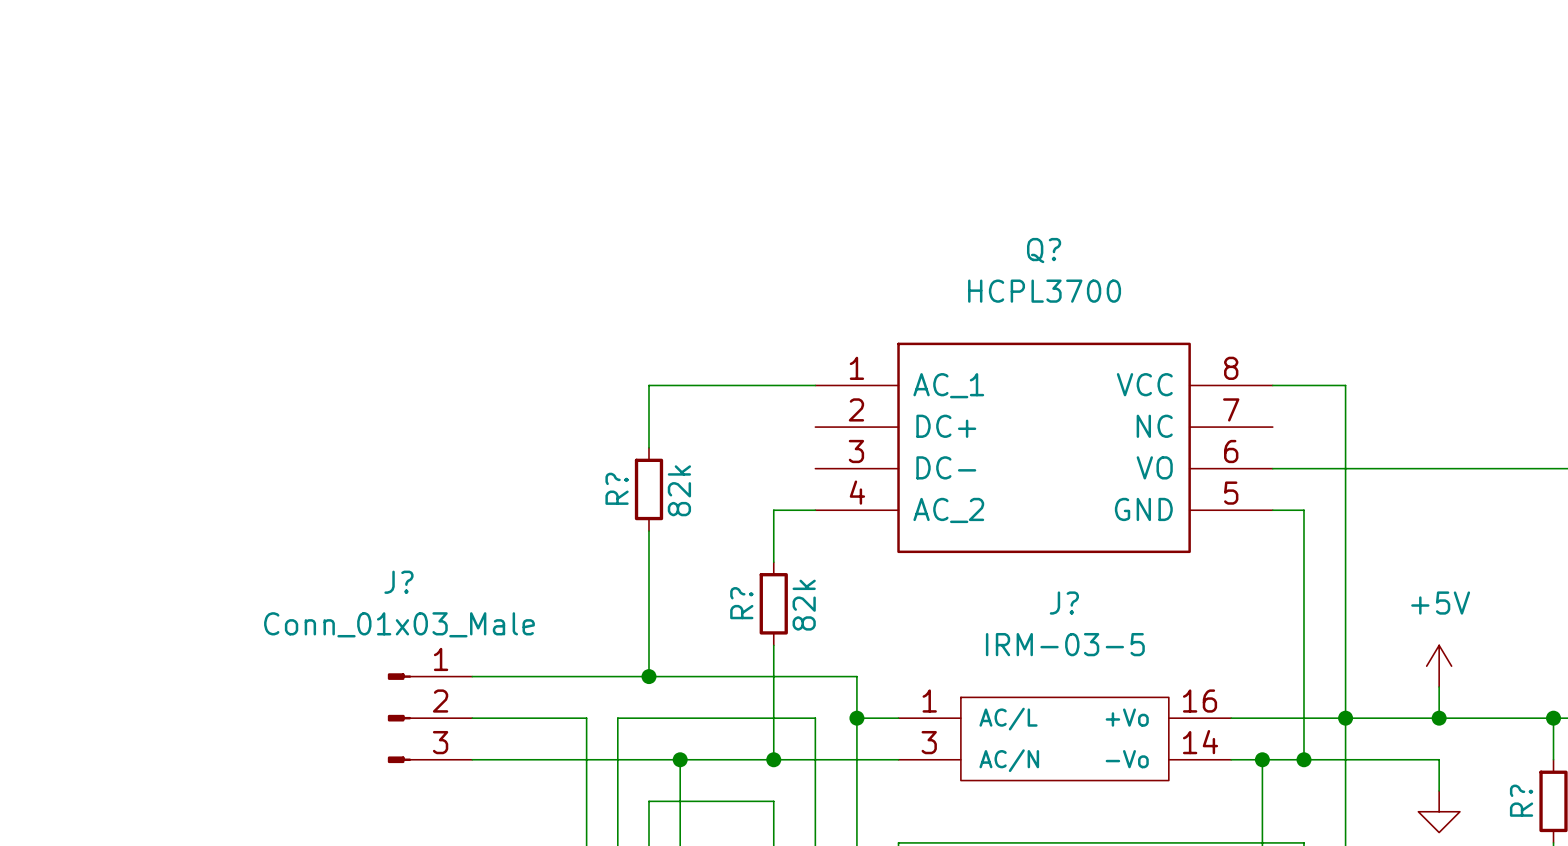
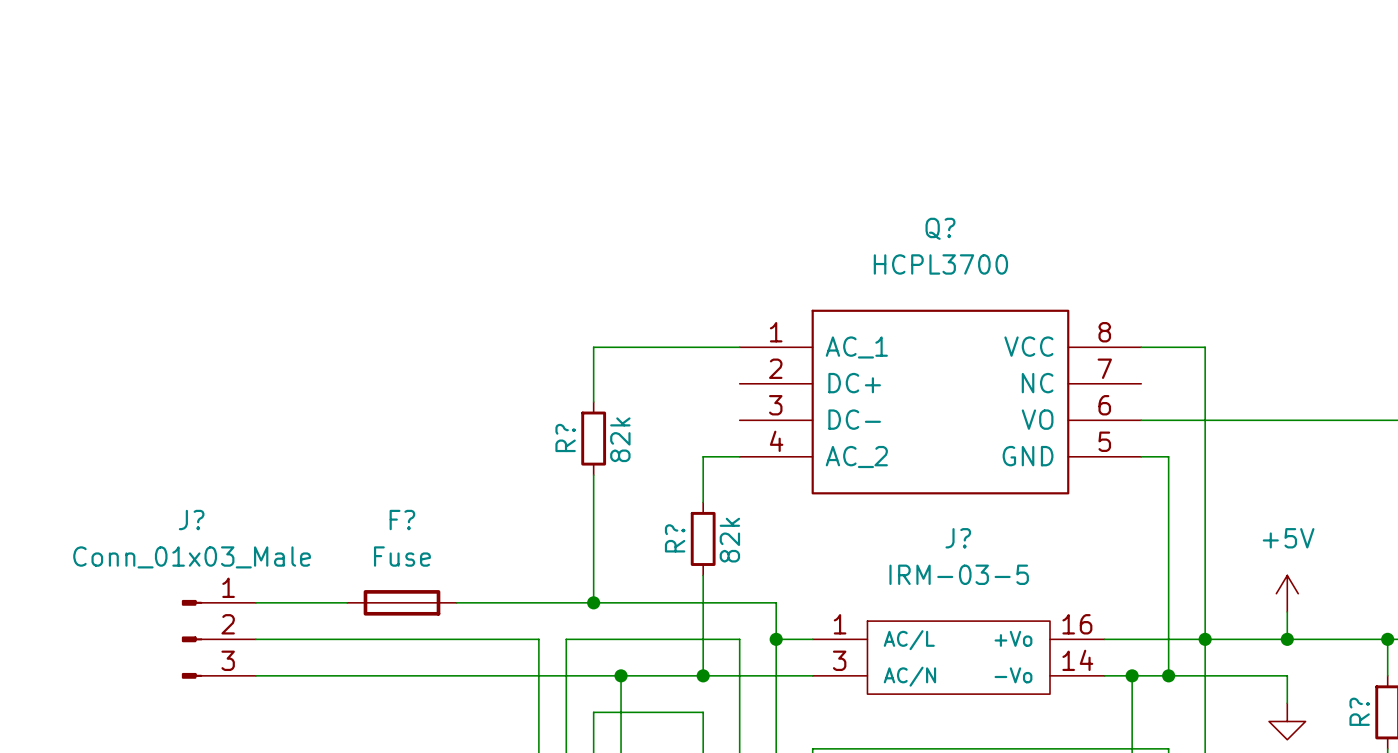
wire: none -> (255, 602) (347, 602)
F?: none -> Fuse (401, 602)
wire: none -> (255, 639) (438, 639)
J? position: (430, 718) -> (218, 639)
wire: none -> (255, 675) (438, 675)

